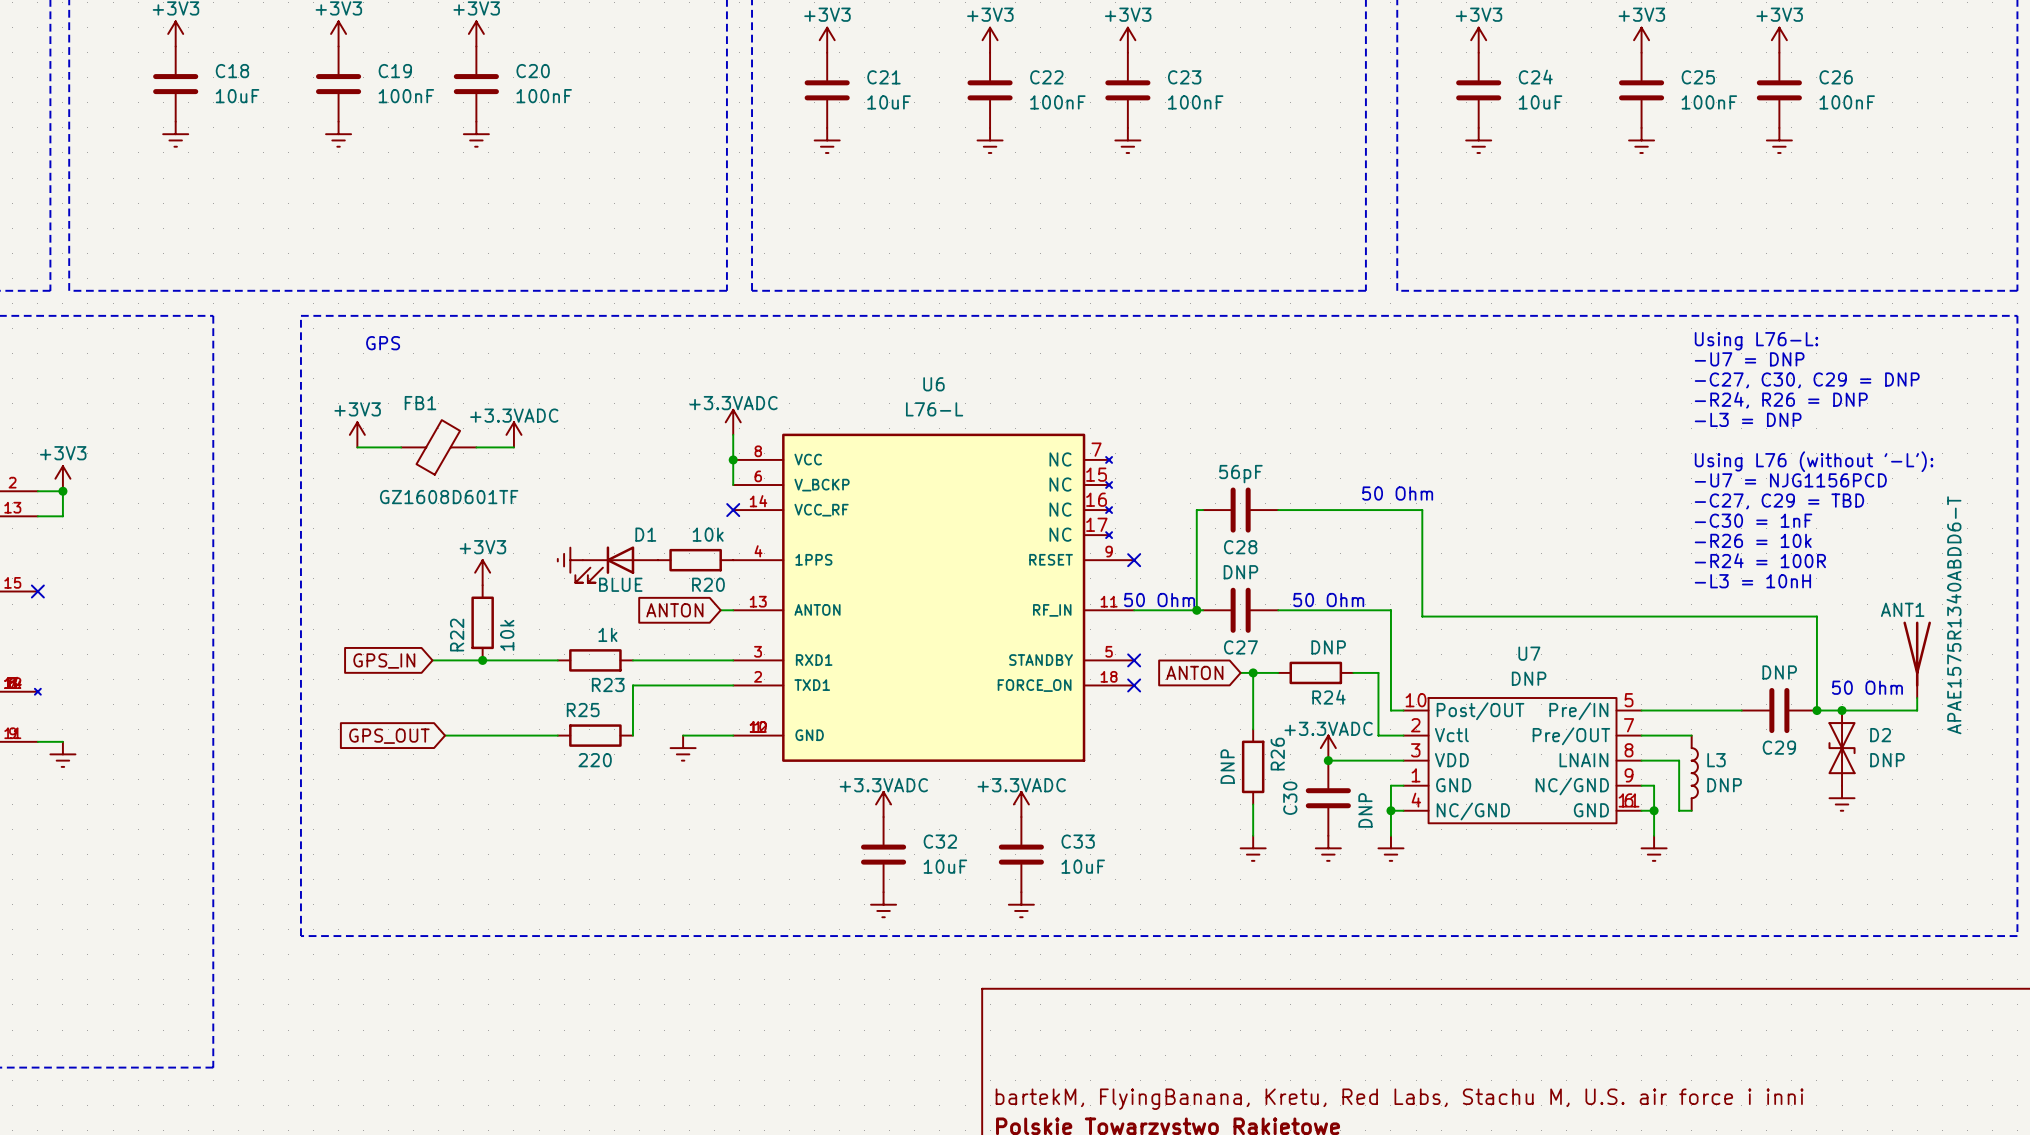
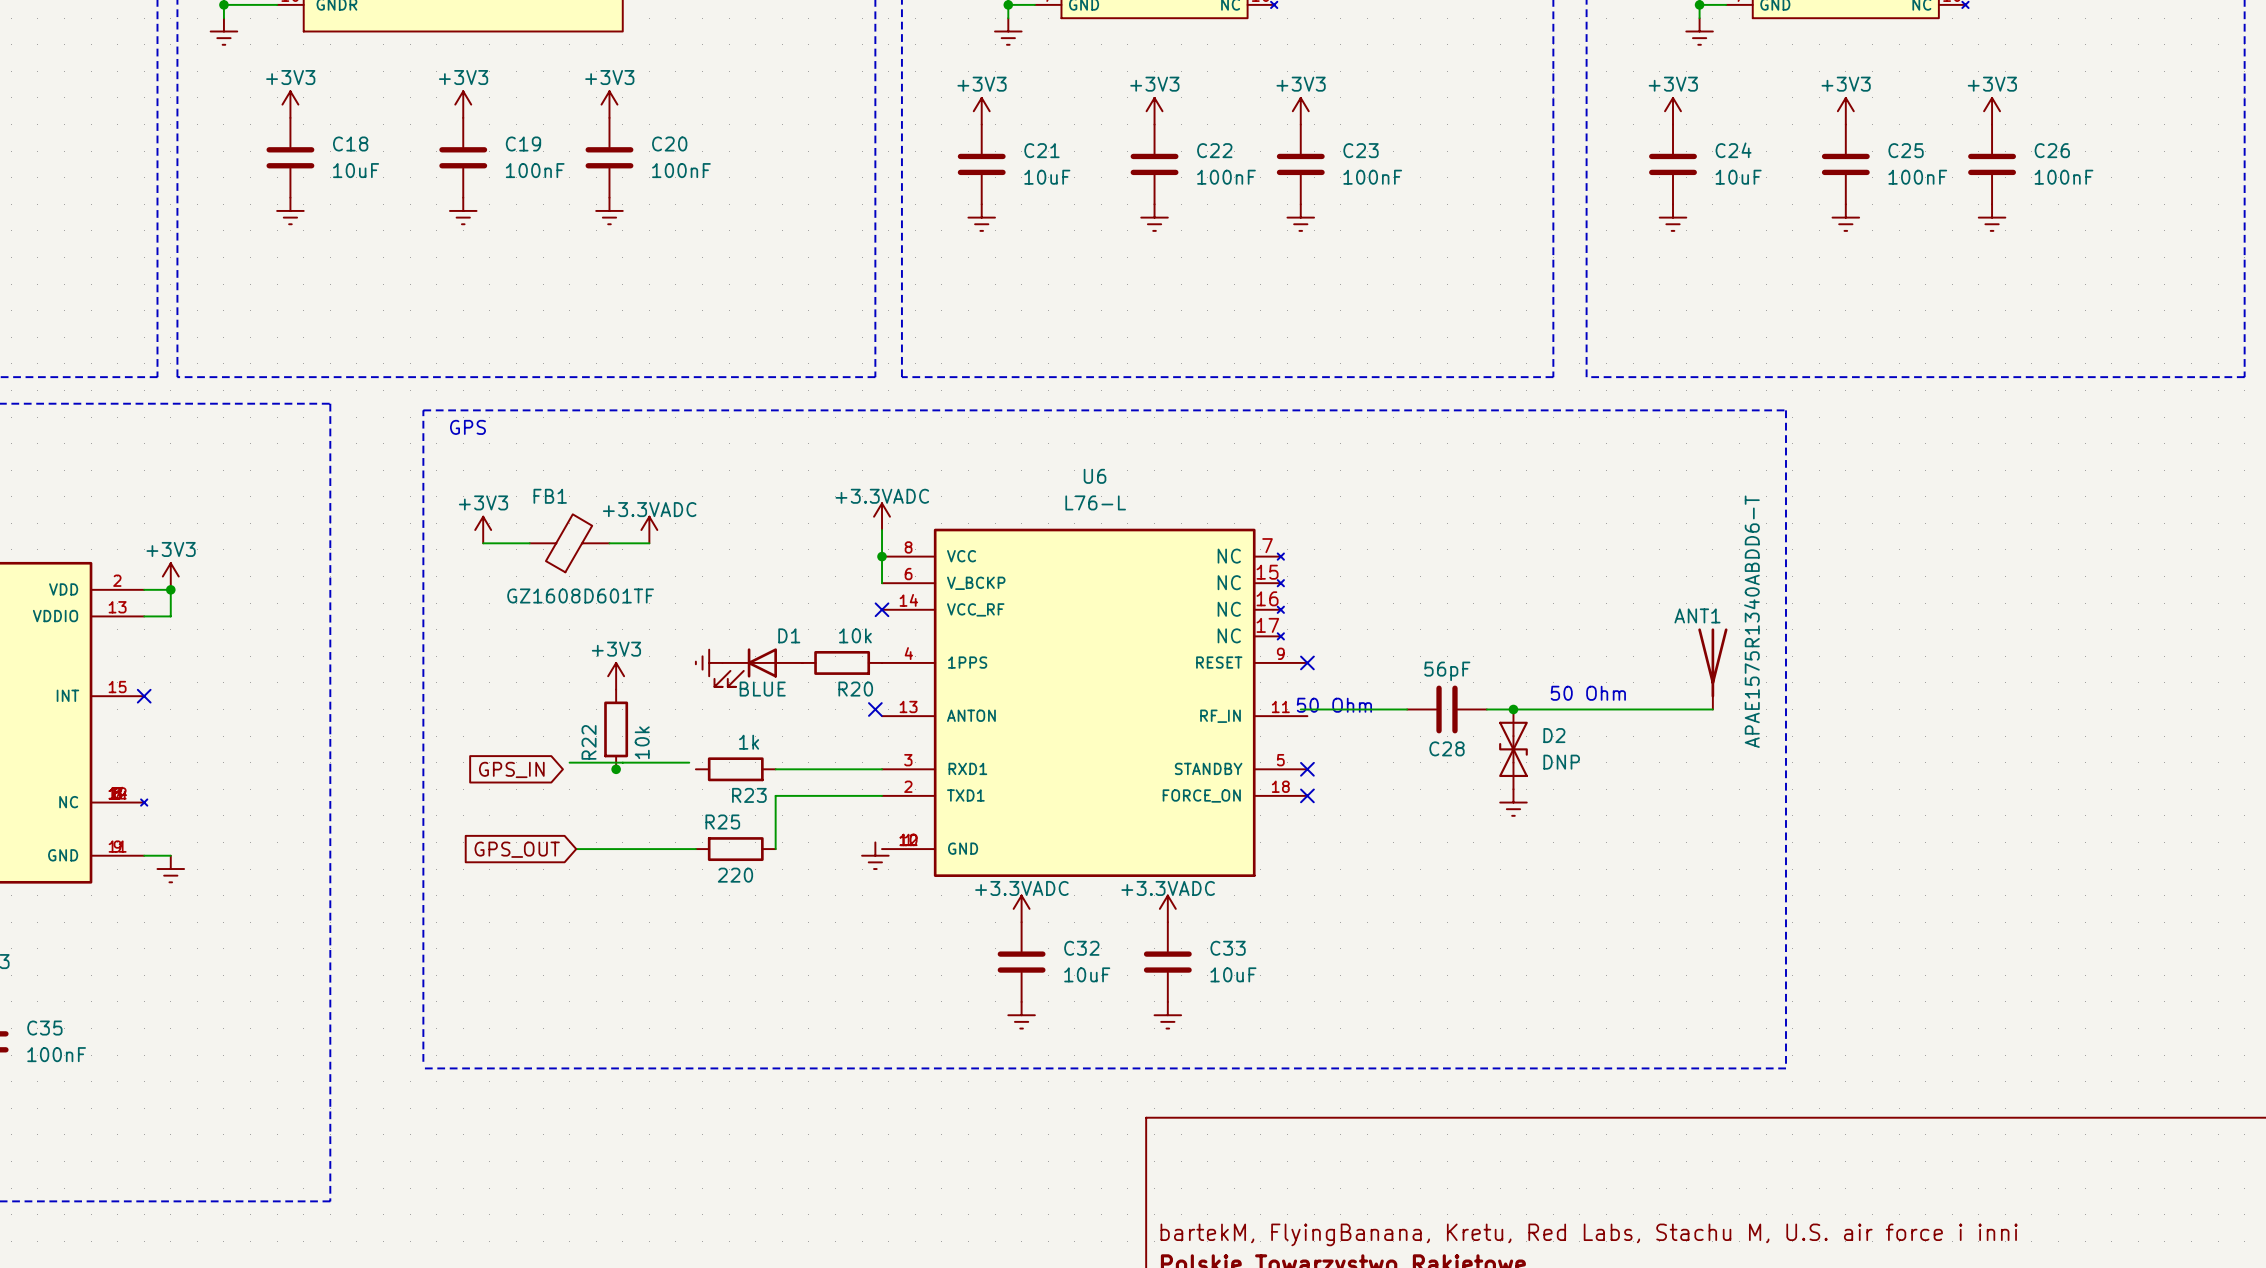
line: (300, 322) (300, 315) (2017, 315) (2017, 936) (300, 936) -> (423, 410) (1786, 410) (1786, 1068) (423, 1068)
text: Using L76-L: (1756, 341) -> none
text position: GPS (383, 343) -> GPS (467, 427)
text: -U7 = DNP (1749, 359) -> none
text: -C27, C30, C29 = DNP (1807, 380) -> none
text: -R24, R26 = DNP (1781, 400) -> none
text: -L3 = DNP (1748, 419) -> none
text: Using L76 (without '-L'): (1814, 461) -> none
text: -U7 = NJG1156PCD (1790, 480) -> none
text: 50 Ohm (1397, 493) -> none
text: -C27, C29 = TBD (1779, 501) -> none
wire: (1203, 510) (1196, 510) (1196, 610) -> none
C28 position: (1240, 510) -> (1447, 709)
wire: (1278, 510) (1422, 510) (1422, 616) (1816, 616) (1816, 710) (1917, 710) (1917, 697) -> none
text: -C30 = 1nF (1753, 520) -> none
text: -R26 = 10k (1753, 540) -> none
text: -R24 = 100R (1760, 560) -> none
text: -L3 = 10nH (1752, 581) -> none
text position: 50 Ohm (1328, 600) -> 50 Ohm (1588, 693)
no-connect mark: none -> (875, 709)
wire: none -> (1300, 709) (1407, 709)
wire: none -> (1486, 709) (1712, 709)
junction: none -> (1513, 709)
global label: ANTON (674, 610) -> none
wire: (720, 610) (733, 610) -> none
wire: (1134, 610) (1203, 610) -> none
junction: (1196, 610) -> none
C27: DNP (1240, 610) -> none
wire: (1278, 610) (1390, 610) (1390, 710) (1403, 710) -> none
wire: none -> (569, 762) (689, 762)
ANT1 position: (1917, 659) -> (1712, 668)
wire: (432, 660) (557, 660) -> none
global label: ANTON (1194, 672) -> none
wire: (1240, 672) (1278, 672) -> none
wire: (1253, 672) (1253, 729) -> none
junction: (1253, 672) -> none
R24: DNP (1315, 672) -> none
wire: (1353, 672) (1378, 672) (1378, 735) (1403, 735) -> none
text: 50 Ohm (1867, 687) -> none
power symbol: none -> (1513, 802)
wire: (1641, 710) (1741, 710) -> none
C29: DNP (1779, 710) -> none
junction: (1816, 710) -> none
junction: (1842, 710) -> none
wire: (683, 735) (733, 735) -> none
wire: (1641, 735) (1691, 735) -> none
power symbol position: (683, 748) -> (875, 855)
power symbol: +3.3VADC (1328, 748) -> none
D2 position: (1842, 748) -> (1513, 749)
wire: (1328, 760) (1403, 760) -> none
junction: (1328, 760) -> none
U7: DNP (1522, 760) -> none
wire: (1641, 760) (1679, 760) (1679, 810) (1691, 810) -> none
R26: DNP (1253, 766) -> none
L3: DNP (1694, 773) -> none
wire: (1403, 785) (1390, 785) (1390, 835) -> none
wire: (1641, 785) (1654, 785) (1654, 835) -> none
C30: DNP (1328, 798) -> none
power symbol: (1842, 798) -> none
power symbol position: +3.3VADC (883, 804) -> +3.3VADC (1021, 908)
power symbol position: +3.3VADC (1021, 804) -> +3.3VADC (1167, 908)
wire: (1253, 804) (1253, 835) -> none
wire: (1390, 810) (1403, 810) -> none
junction: (1390, 810) -> none
wire: (1641, 810) (1654, 810) -> none
junction: (1654, 810) -> none
power symbol: (1253, 848) -> none
power symbol: (1328, 848) -> none
power symbol: (1390, 848) -> none
power symbol: (1654, 848) -> none
C32 position: (883, 854) -> (1021, 962)
C33 position: (1021, 854) -> (1167, 962)
power symbol position: (883, 904) -> (1021, 1015)
power symbol position: (1021, 904) -> (1167, 1015)

